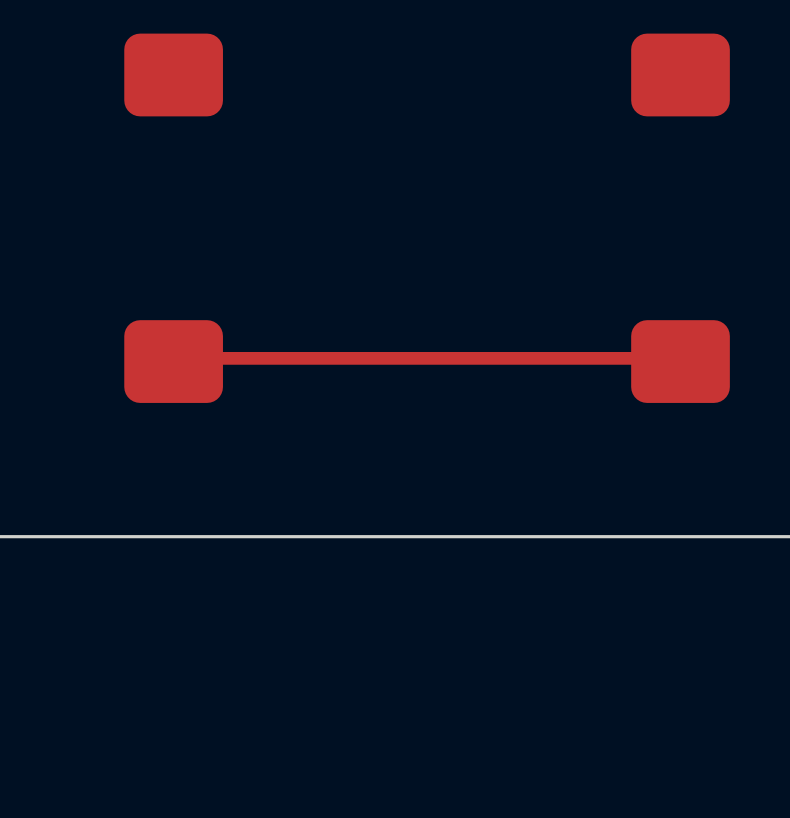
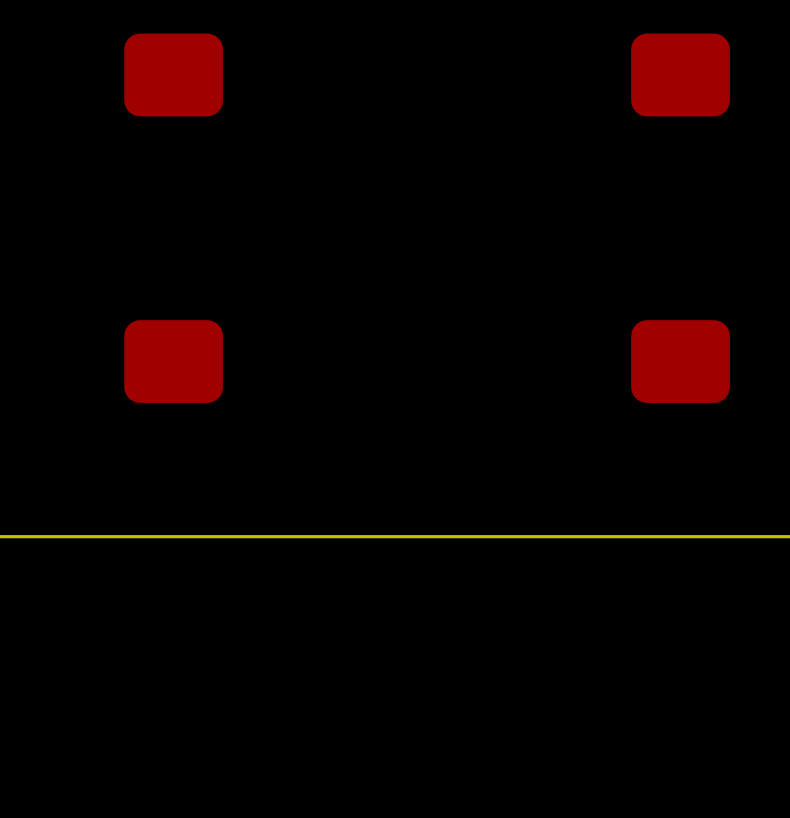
top track: (681, 358) (172, 358) -> none

